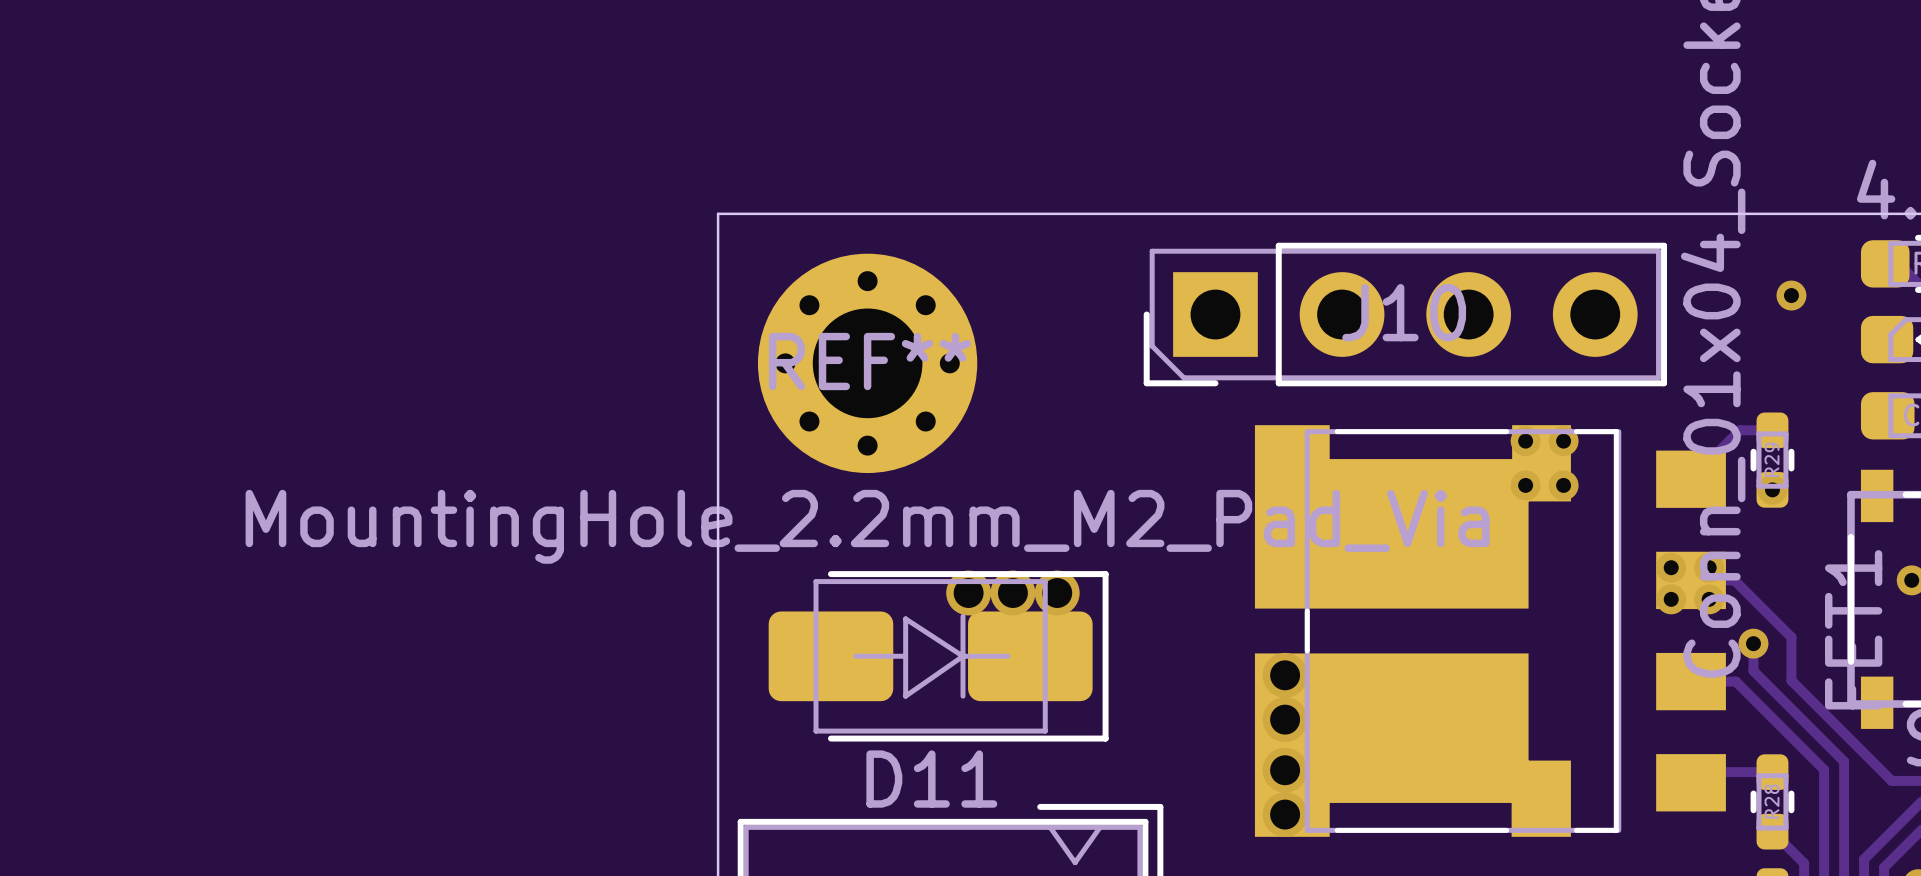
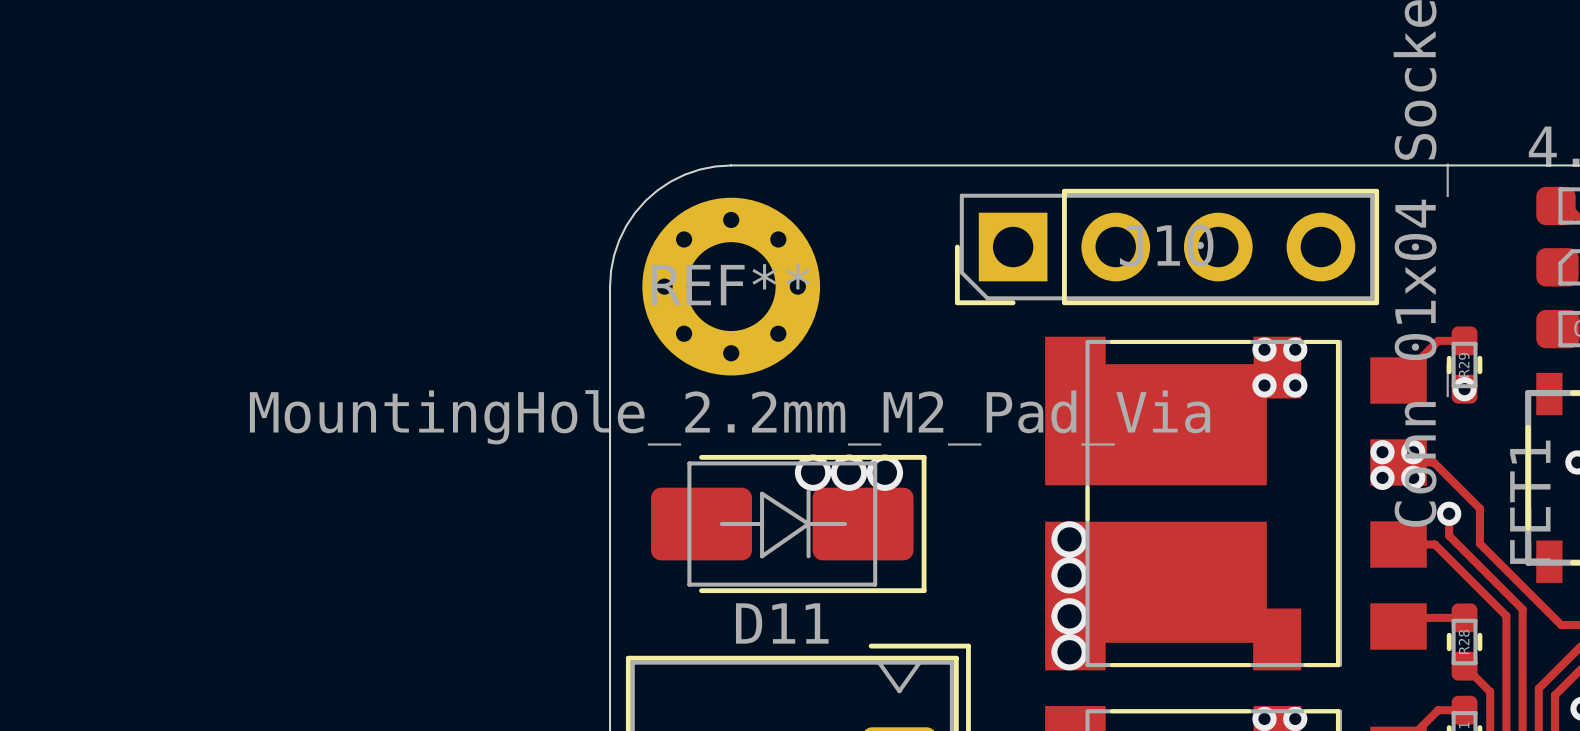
board edge: (867, 213) (718, 213) (718, 363) -> (731, 165) (715, 166) (684, 174) (670, 181) (645, 200) (635, 212) (619, 240) (611, 270) (610, 286)
via: (1791, 295) -> none

